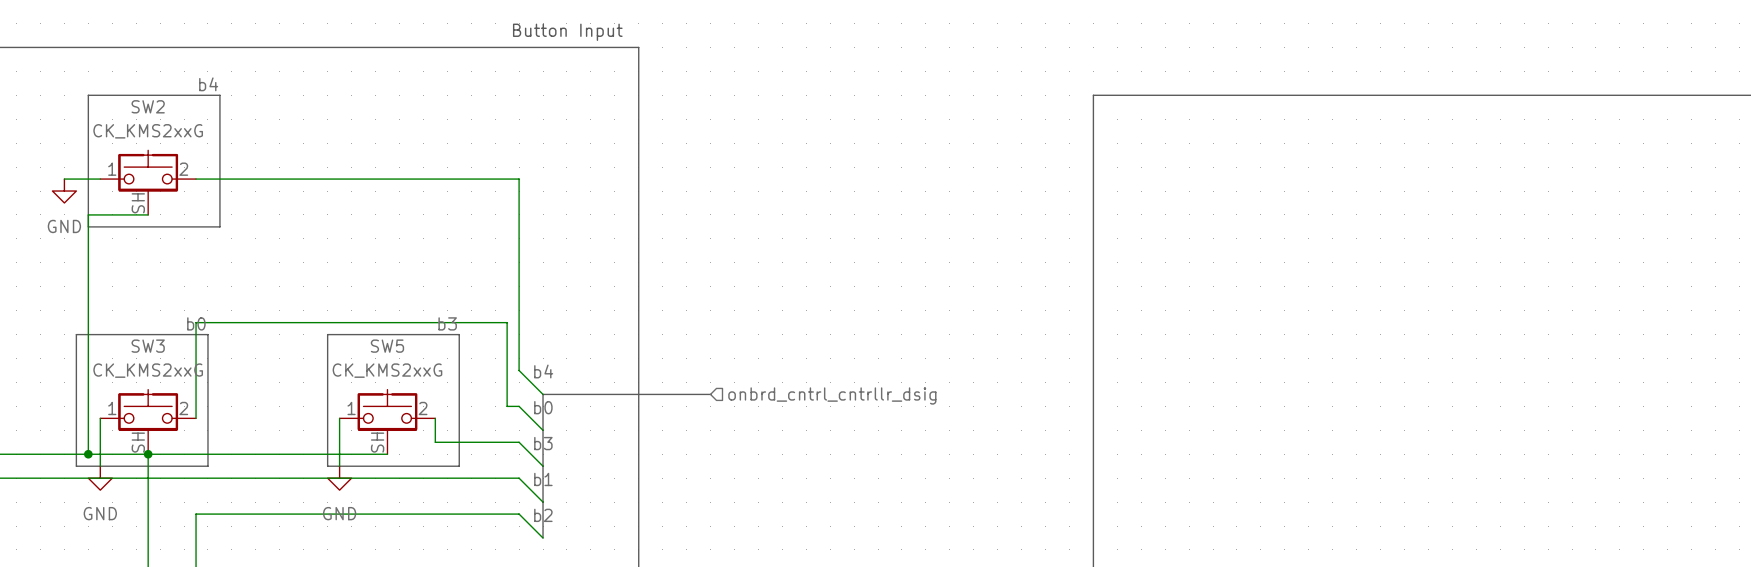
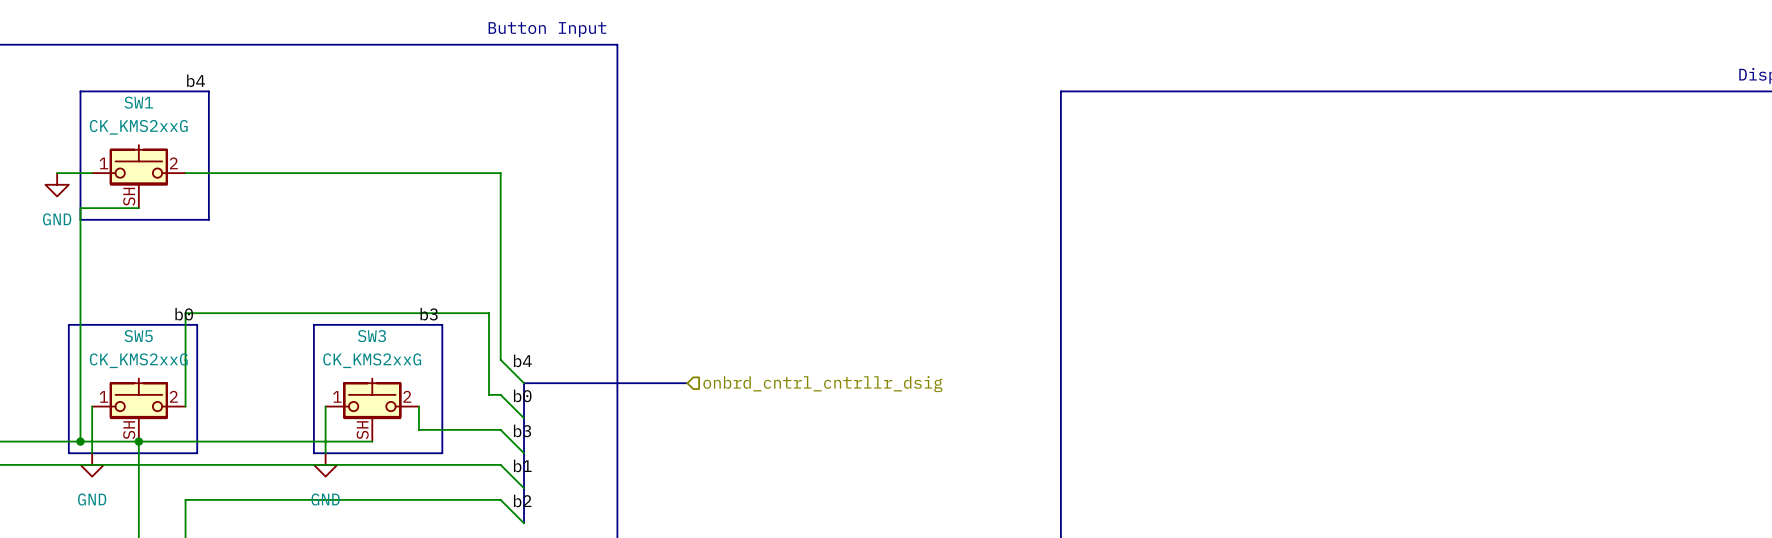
SW2 name: SW2 (148, 106) -> SW1 (138, 102)
SW3 name: SW3 (148, 346) -> SW5 (138, 336)
SW5 name: SW5 (387, 346) -> SW3 (371, 336)

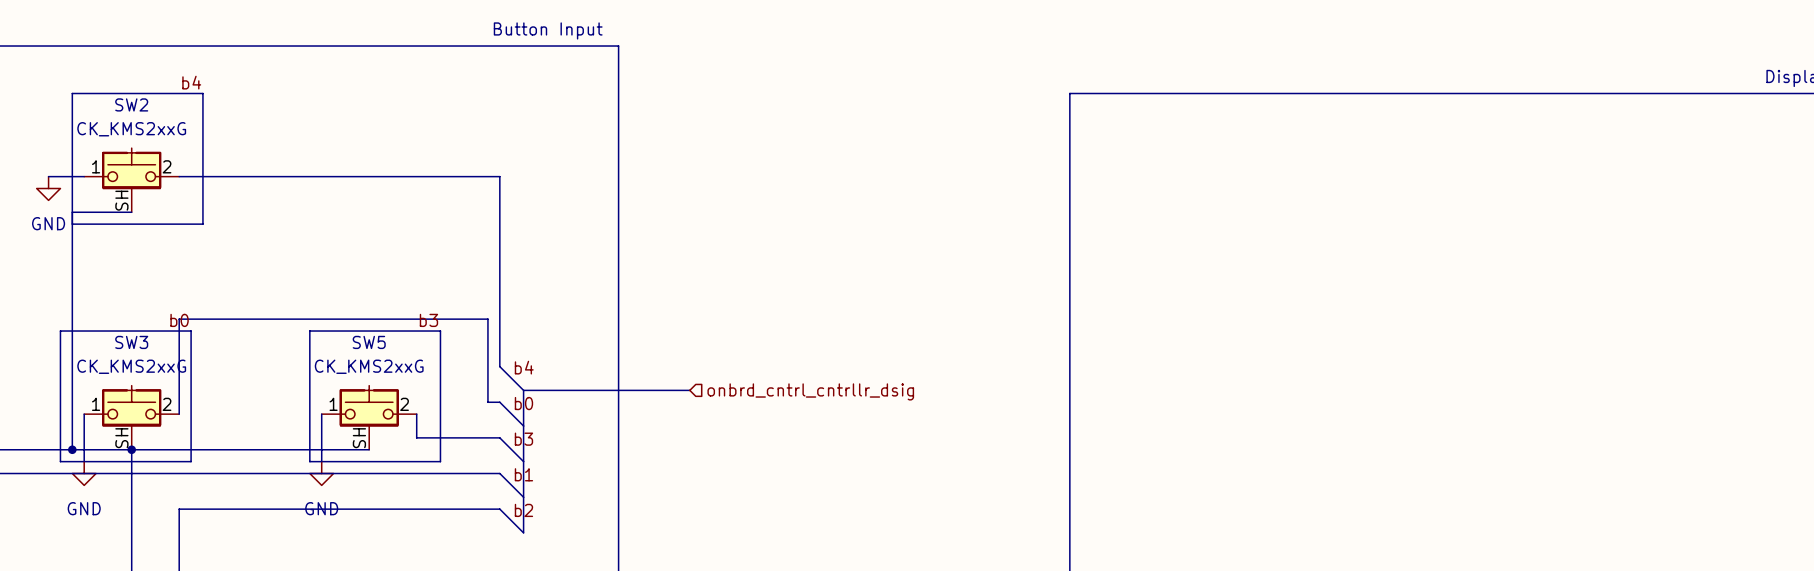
SW1 name: SW1 (138, 102) -> SW2 (131, 104)
SW5 name: SW5 (138, 336) -> SW3 (131, 342)
SW3 name: SW3 (371, 336) -> SW5 (369, 342)

